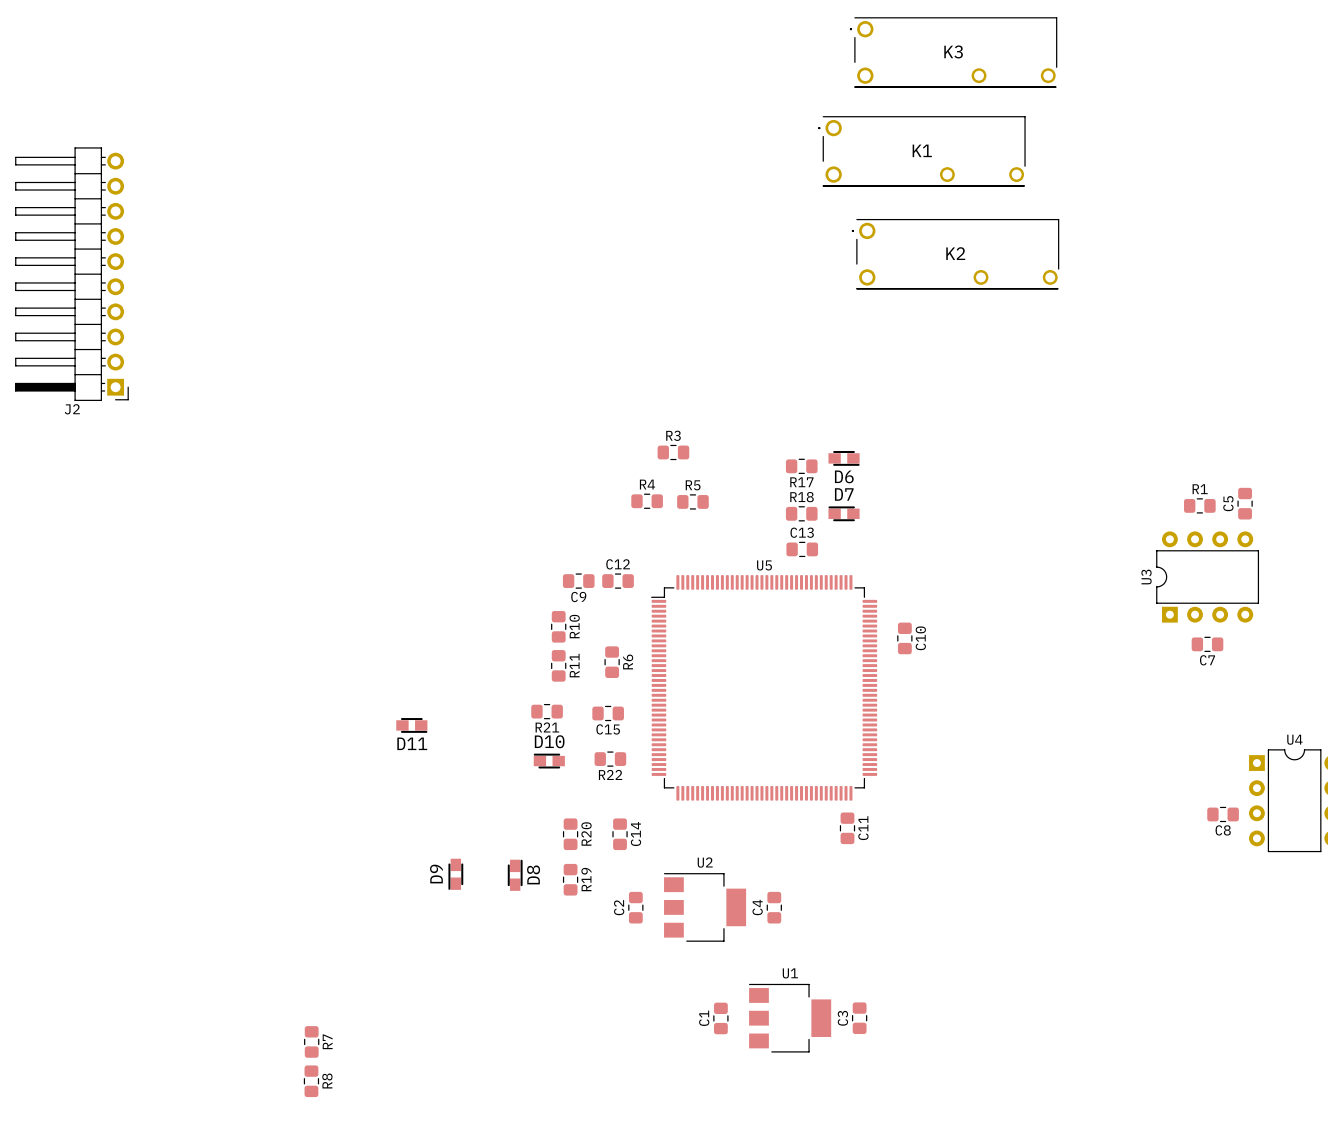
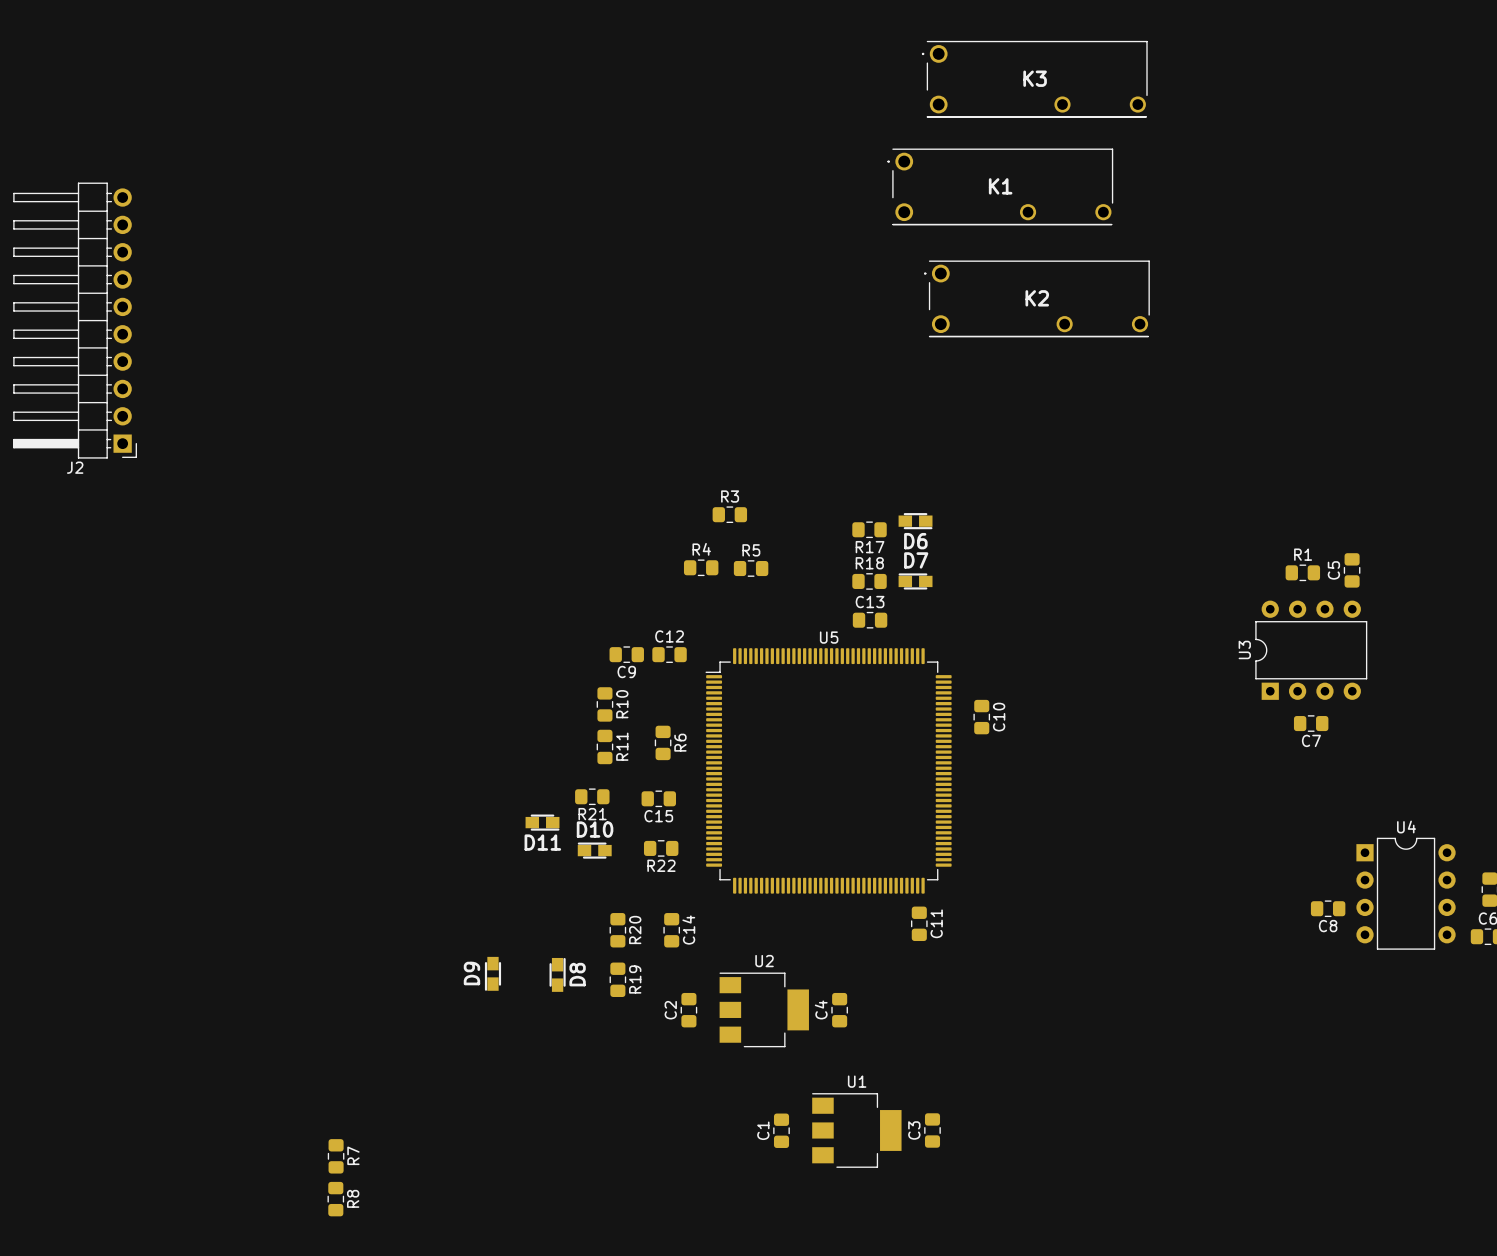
D11 position: (411, 725) -> (542, 822)

